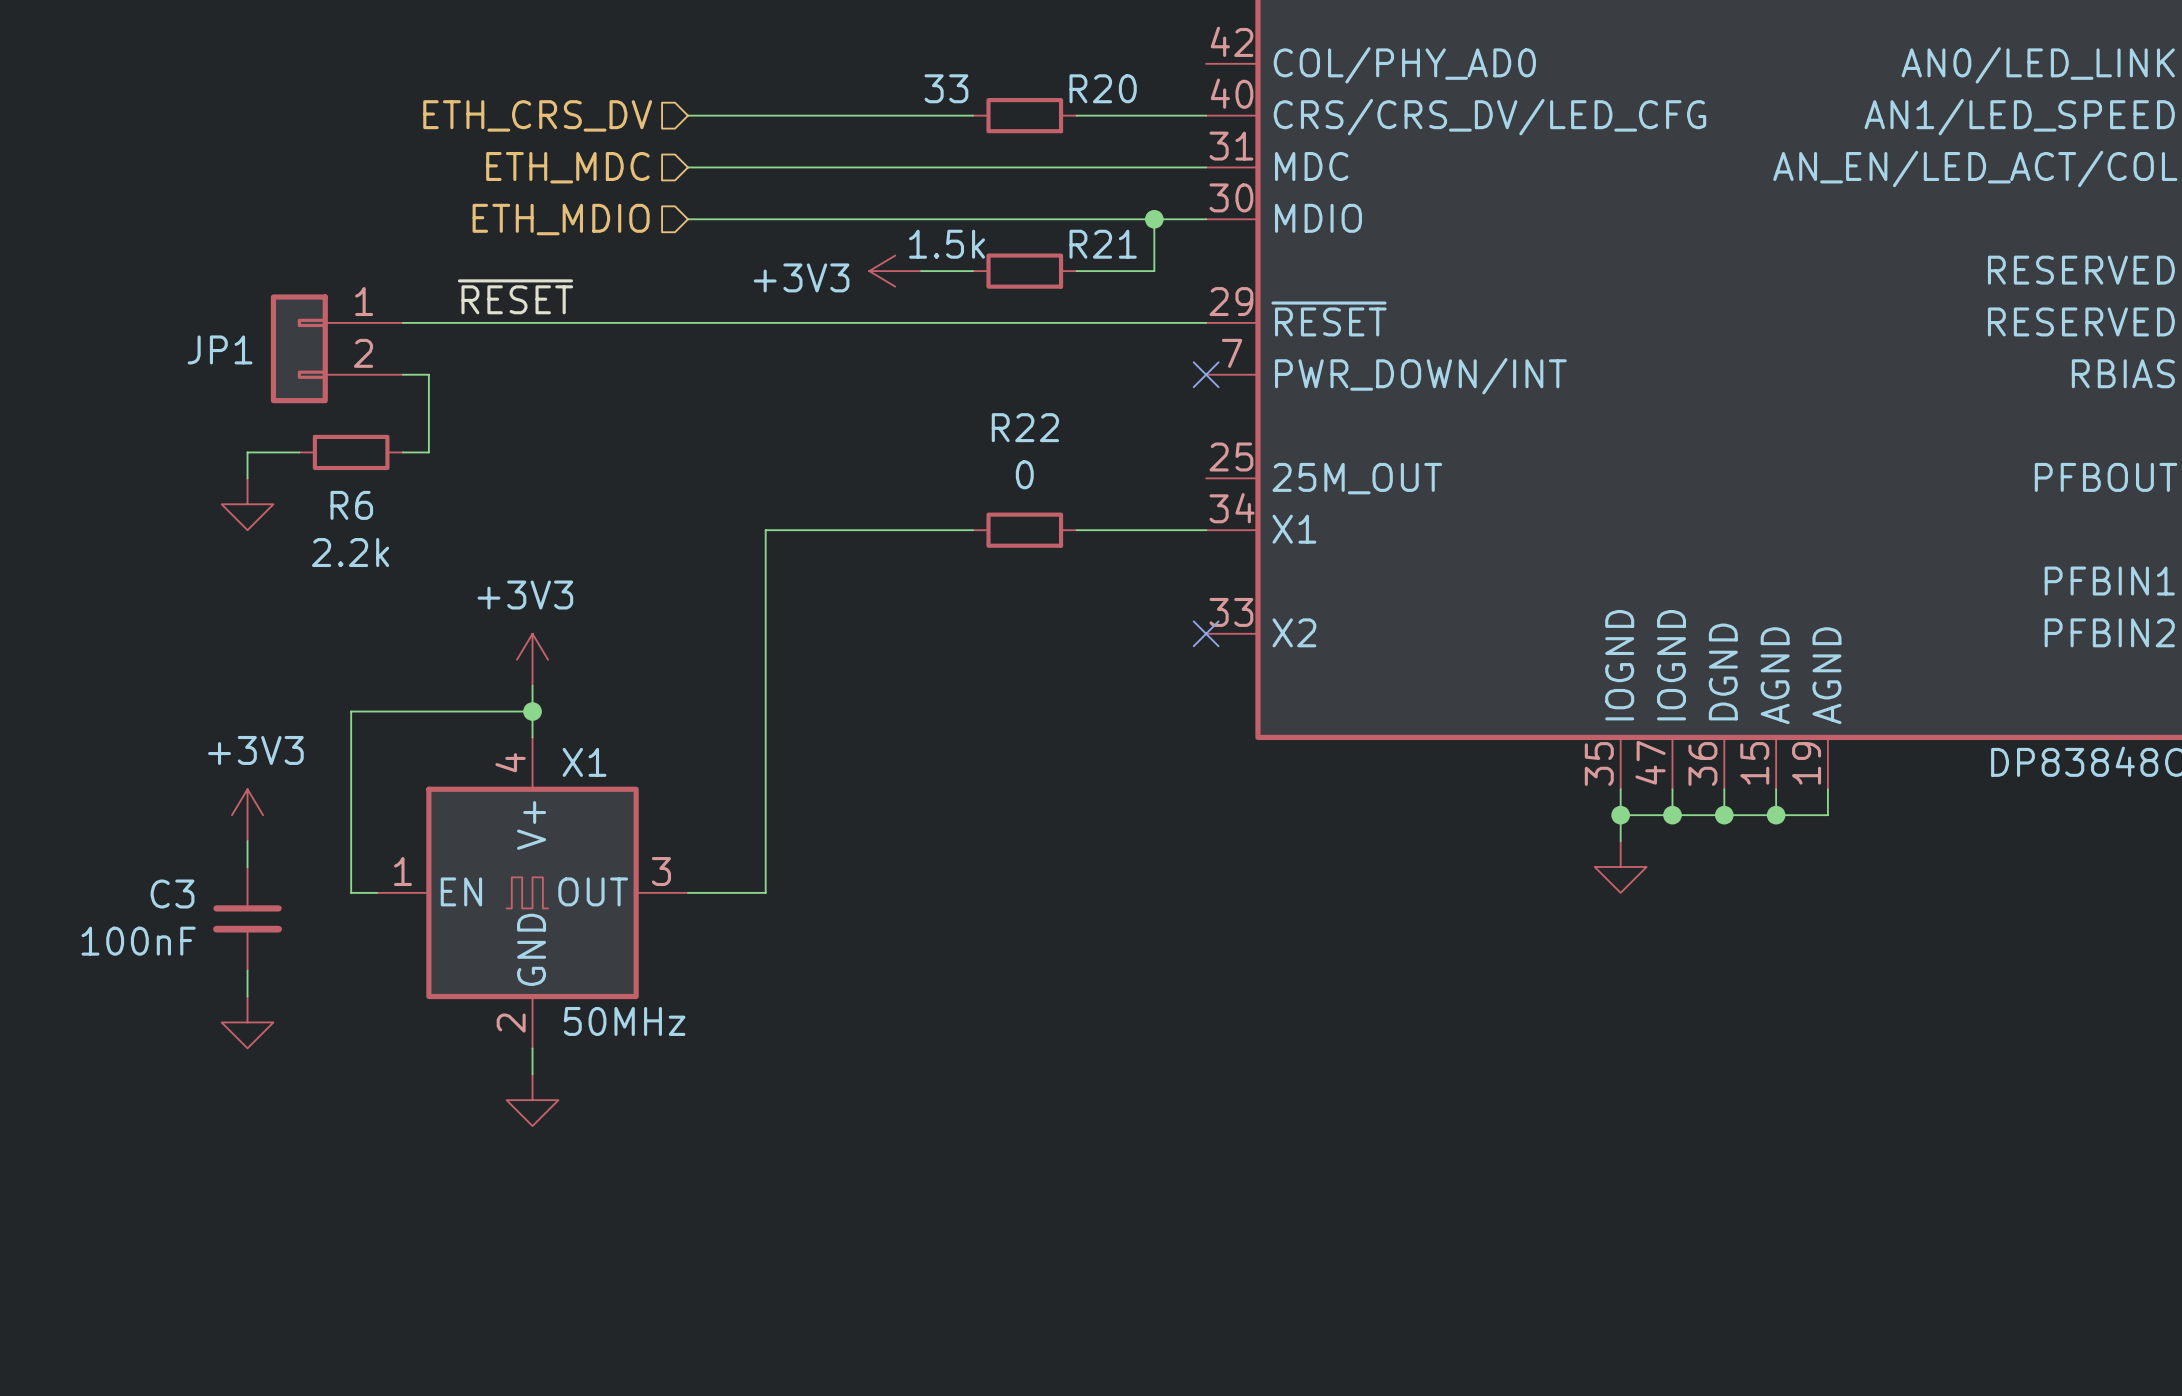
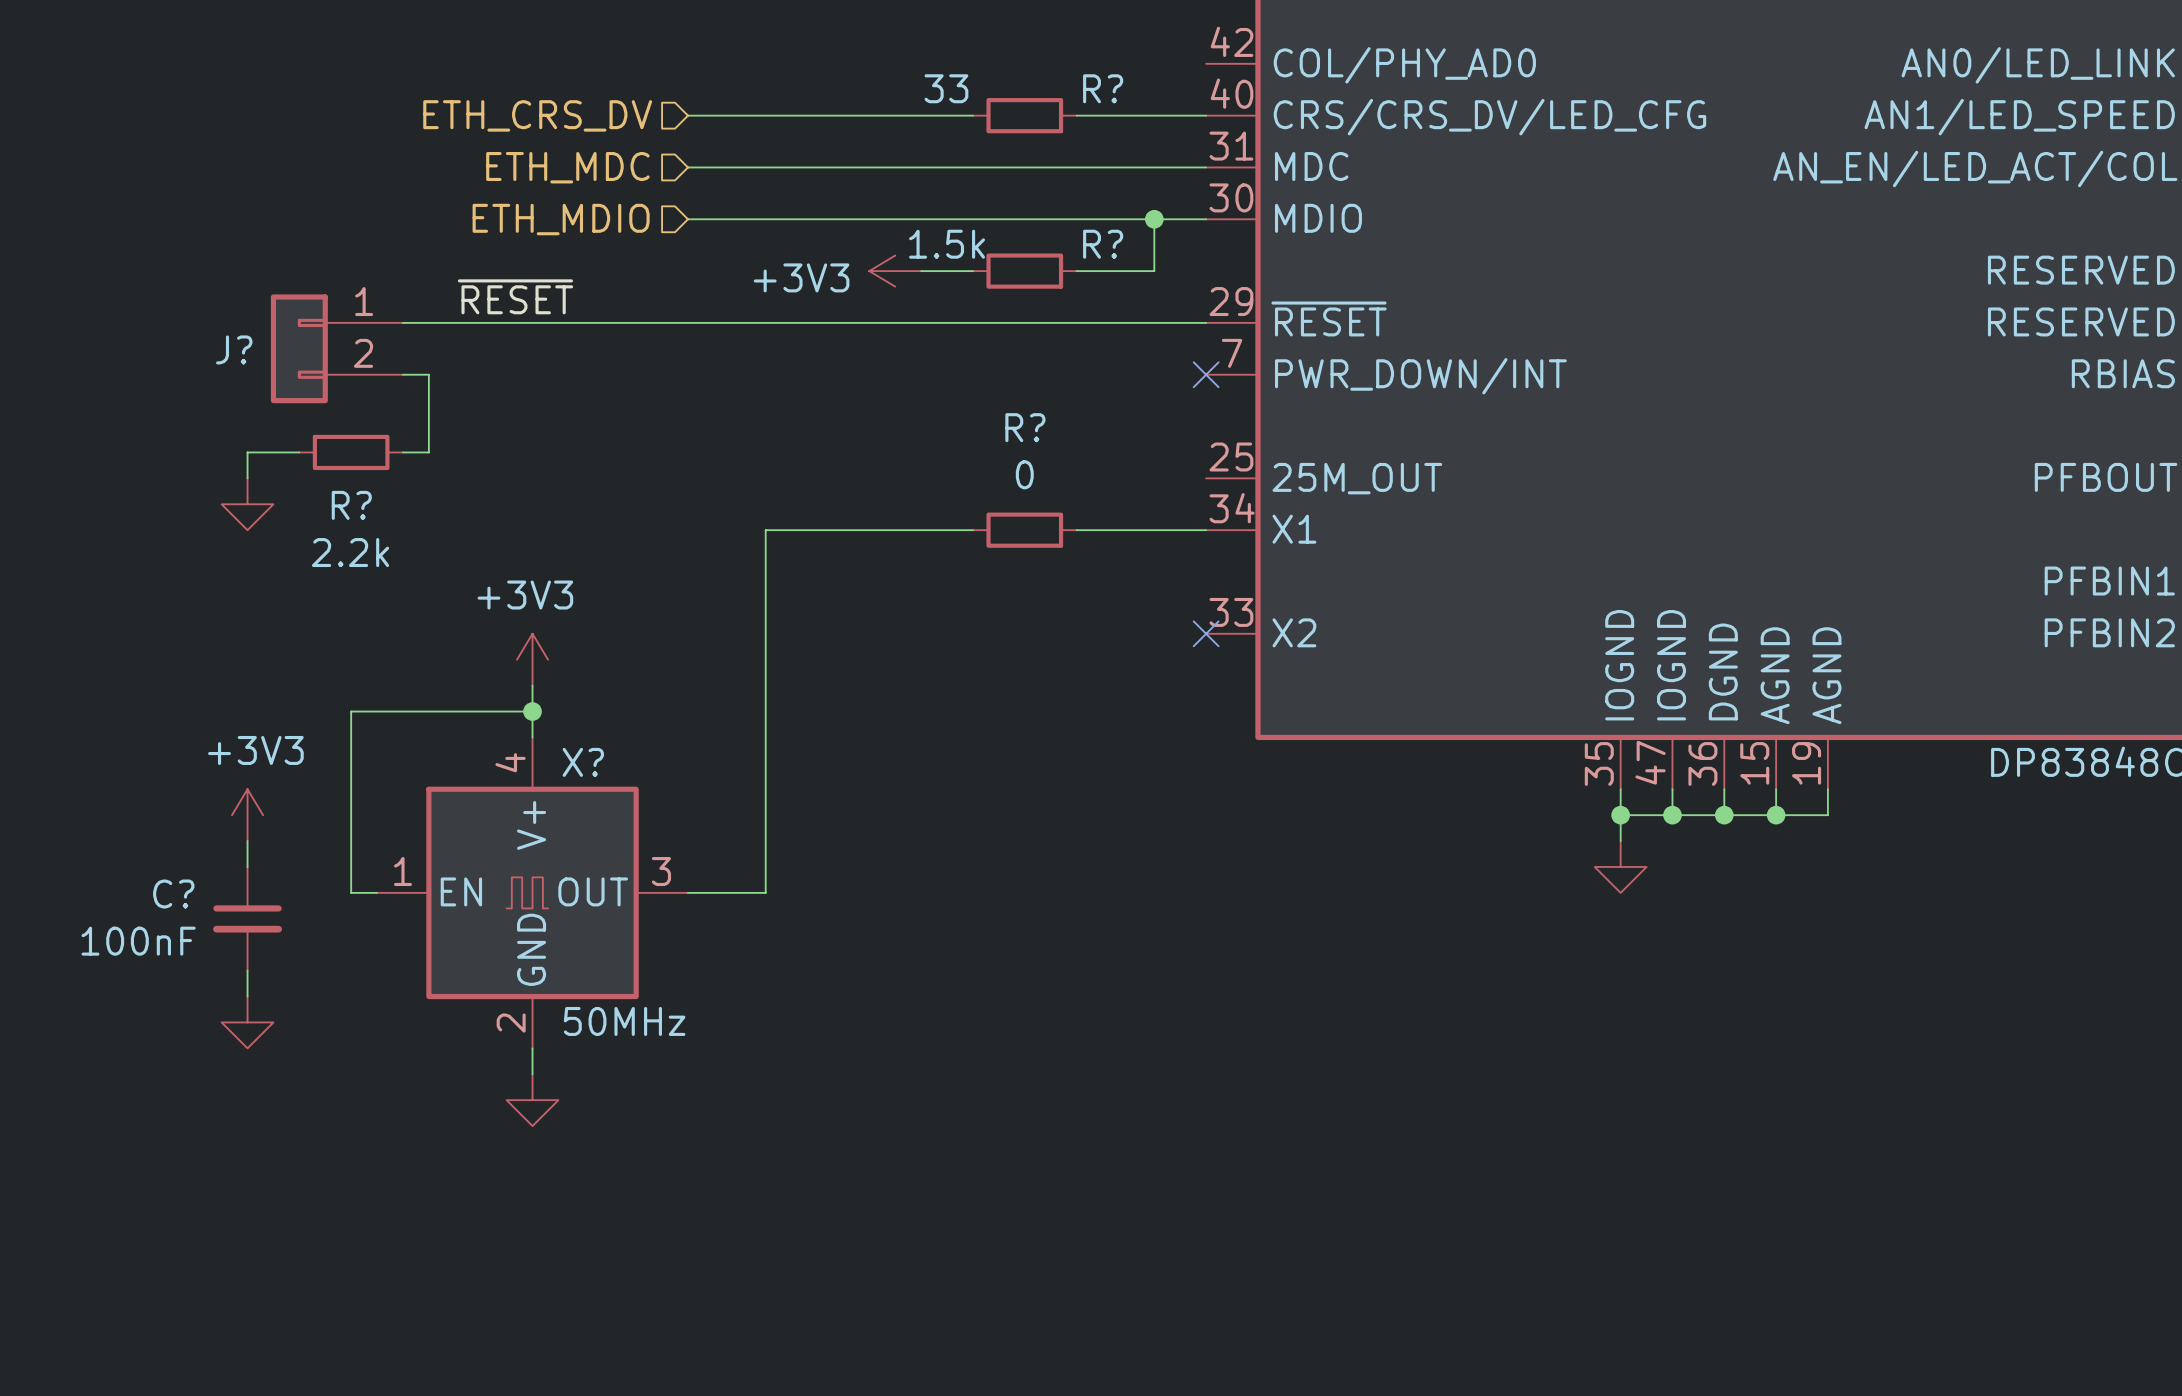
R20 name: R20 (1103, 88) -> R? (1103, 88)
R21 name: R21 (1103, 244) -> R? (1103, 244)
JP1 name: JP1 (220, 349) -> J? (234, 349)
R22 name: R22 (1025, 427) -> R? (1025, 427)
R6 name: R6 (351, 505) -> R? (351, 505)
X1 name: X1 (584, 762) -> X? (583, 762)
C3 name: C3 (172, 893) -> C? (173, 893)

